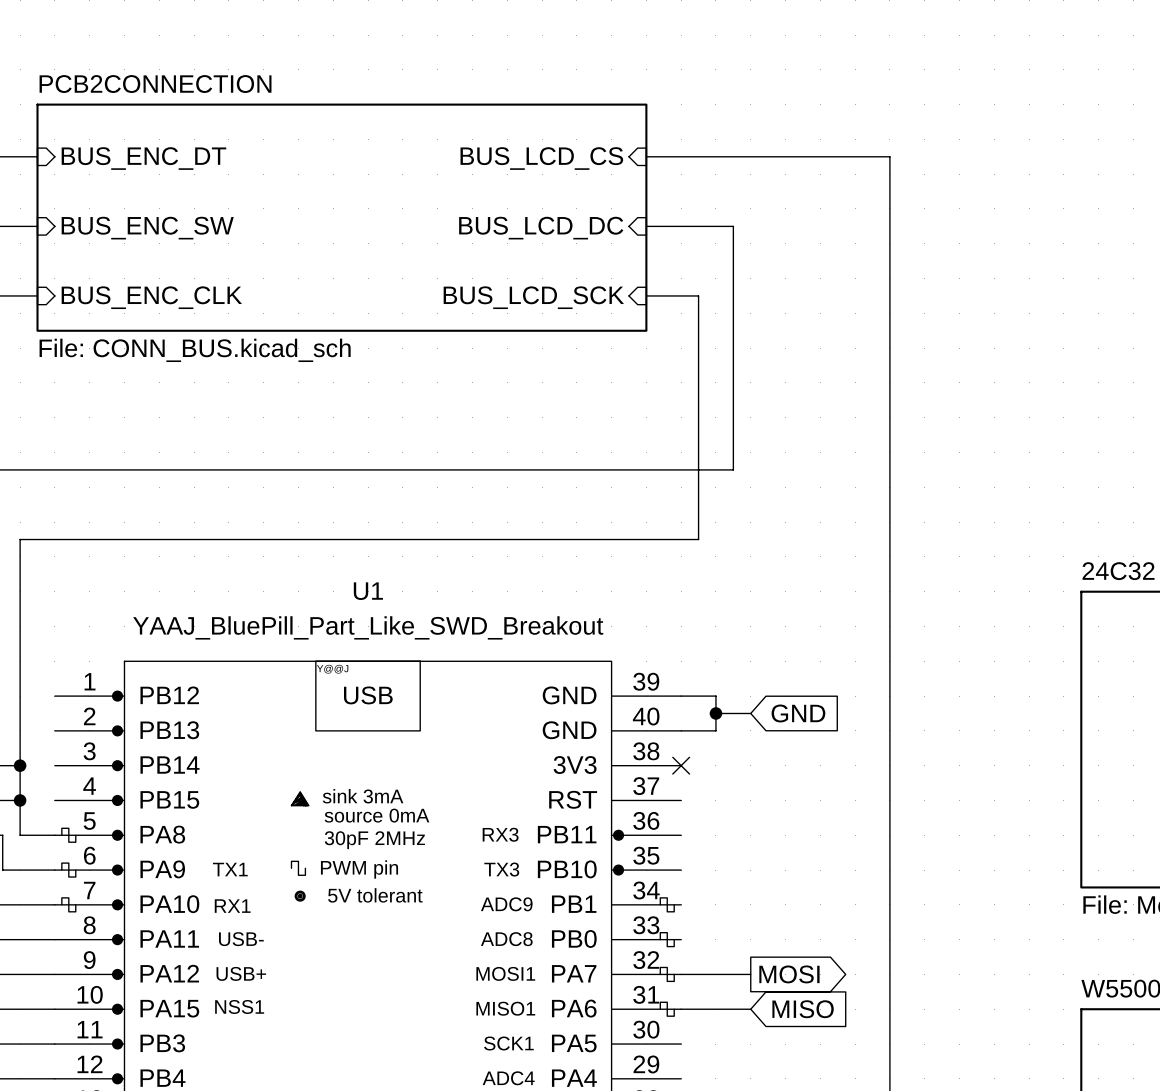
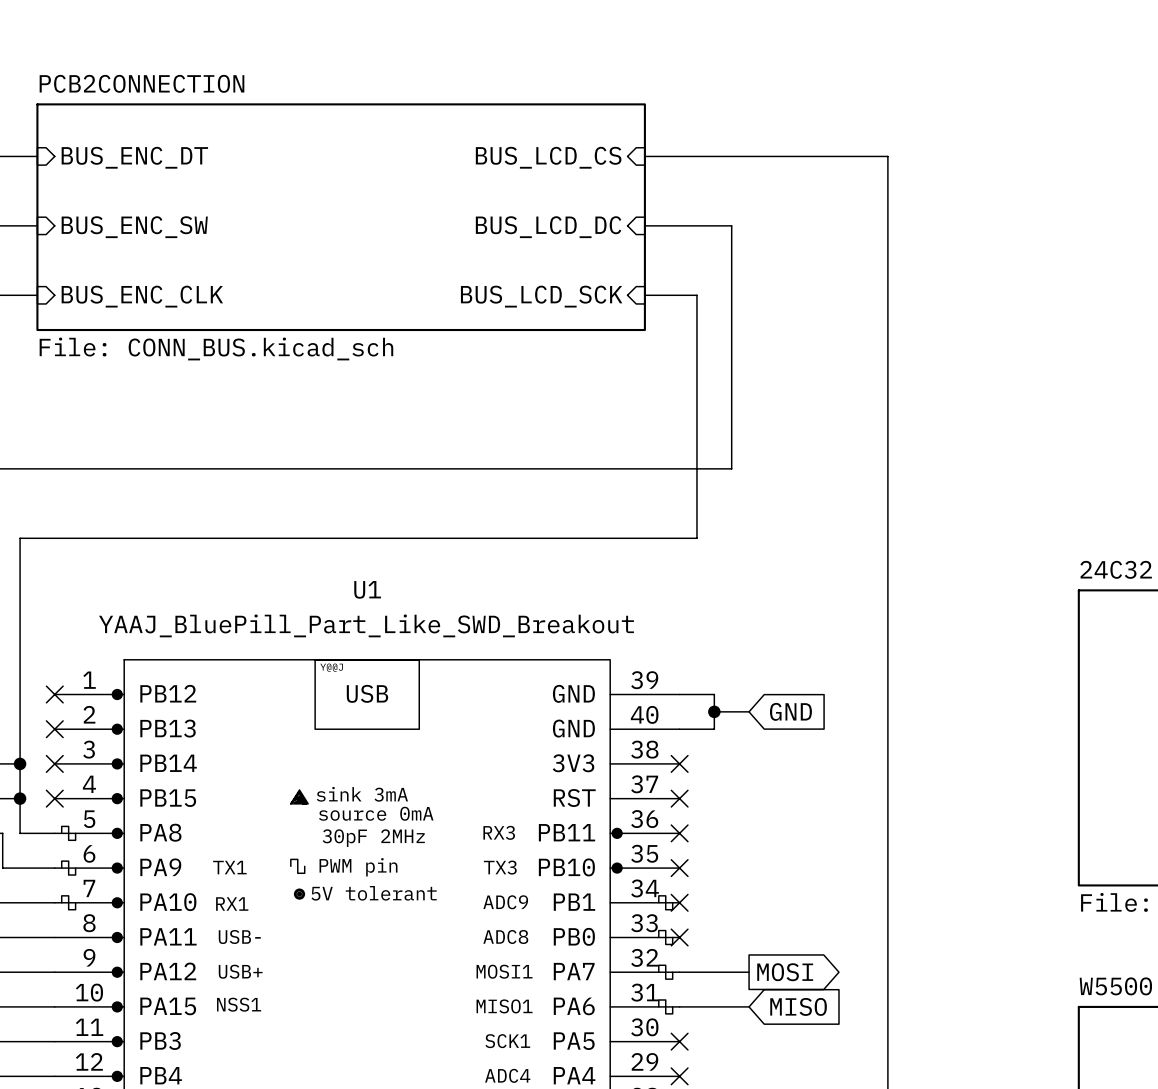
no-connect mark: none -> (54, 694)
no-connect mark: none -> (54, 729)
no-connect mark: none -> (54, 763)
no-connect mark: none -> (54, 798)
no-connect mark: none -> (679, 798)
no-connect mark: none -> (679, 833)
no-connect mark: none -> (679, 868)
no-connect mark: none -> (679, 902)
no-connect mark: none -> (679, 937)
no-connect mark: none -> (679, 1041)
no-connect mark: none -> (679, 1076)

